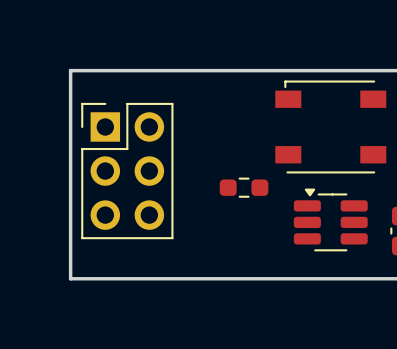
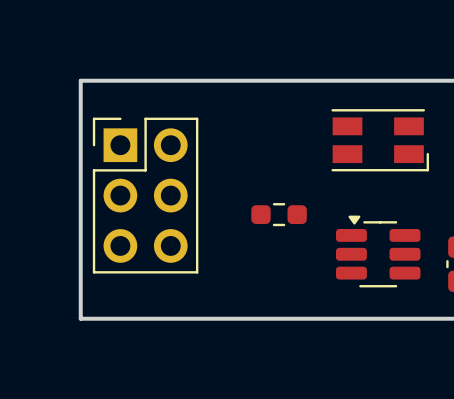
part footprint: [275, 80, 387, 174] -> [331, 109, 430, 172]

